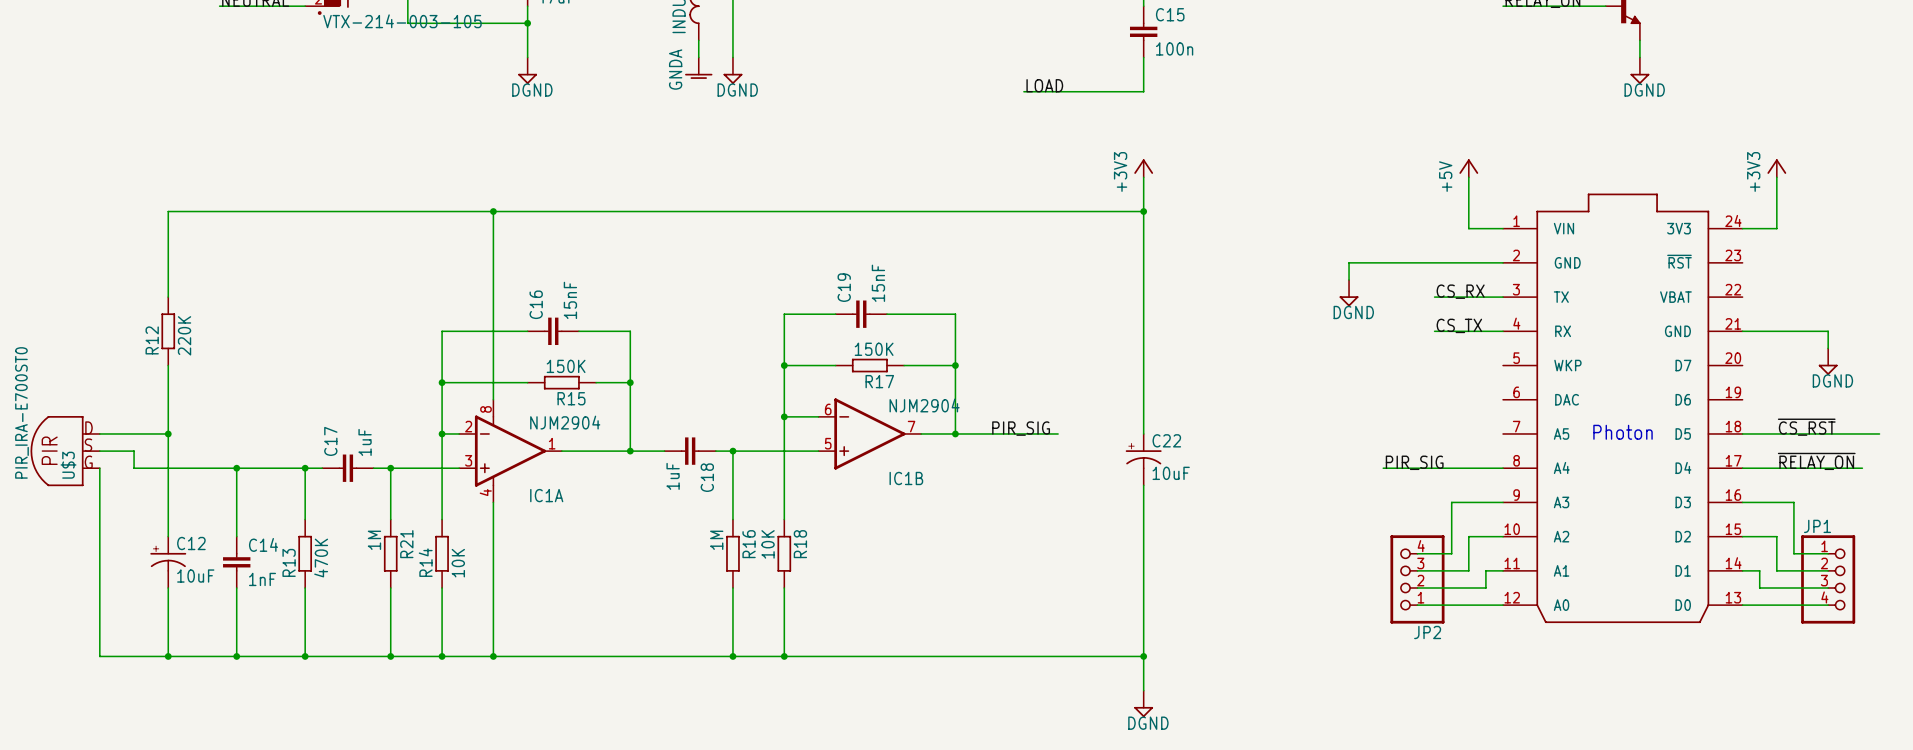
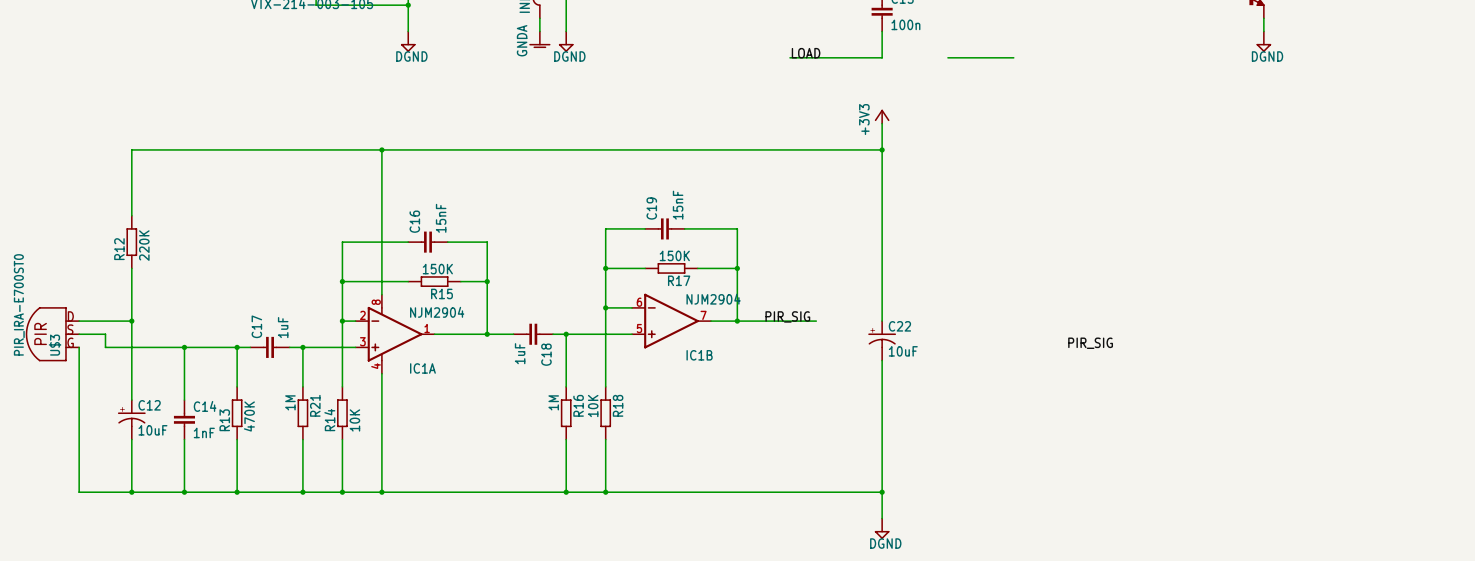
wire: none -> (947, 57) (1013, 57)
power symbol: +5V (1468, 168) -> none
power symbol: +3V3 (1776, 168) -> none
wire: (1468, 177) (1468, 228) (1503, 228) -> none
wire: (1776, 177) (1776, 228) (1742, 228) -> none
wire: (1503, 262) (1349, 262) (1349, 279) -> none
label: CS_RX (1460, 291) -> none
power symbol: DGND (1349, 293) -> none
wire: (1434, 297) (1503, 297) -> none
label: CS_TX (1459, 325) -> none
wire: (1434, 331) (1503, 331) -> none
wire: (1742, 331) (1828, 331) (1828, 348) -> none
power symbol: DGND (1828, 361) -> none
part: (1622, 408) -> none
label: ~{CS_RST} (1806, 427) -> none
wire: (1742, 433) (1879, 433) -> none
label: ~{RELAY_ON} (1816, 461) -> none
wire: (1383, 468) (1503, 468) -> none
wire: (1742, 468) (1862, 468) -> none
wire: (1503, 502) (1451, 502) (1451, 553) (1417, 553) -> none
wire: (1742, 502) (1793, 502) (1793, 553) (1828, 553) -> none
wire: (1503, 536) (1468, 536) (1468, 570) (1417, 570) -> none
wire: (1742, 536) (1776, 536) (1776, 570) (1828, 570) -> none
wire: (1503, 570) (1485, 570) (1485, 588) (1417, 588) -> none
wire: (1742, 570) (1759, 570) (1759, 588) (1828, 588) -> none
JP2: (1417, 579) -> none
JP1: (1828, 579) -> none
wire: (1417, 605) (1503, 605) -> none
wire: (1742, 605) (1828, 605) -> none

